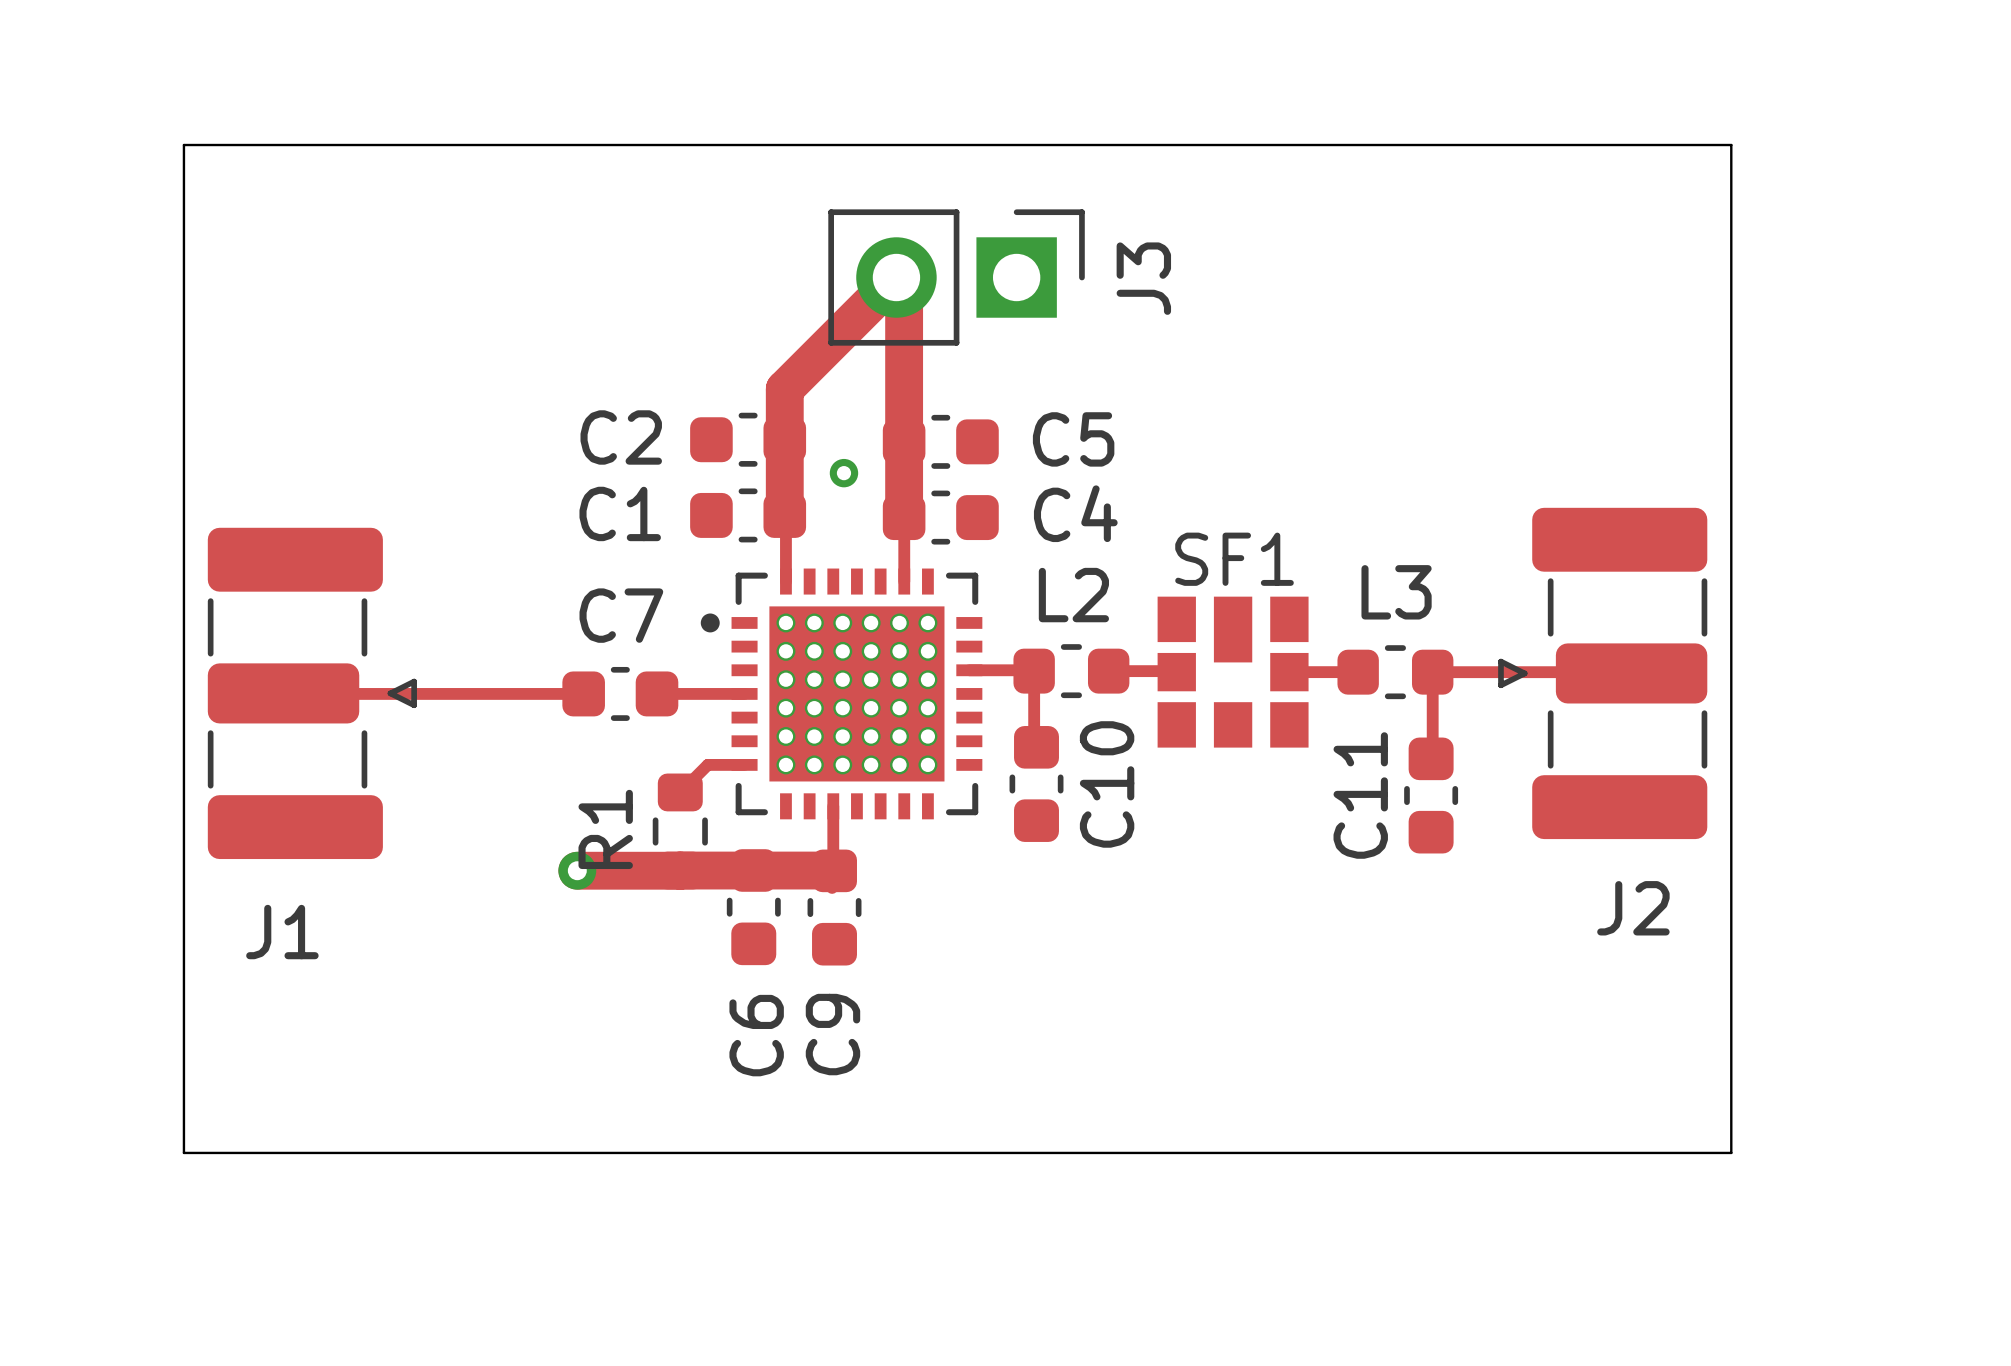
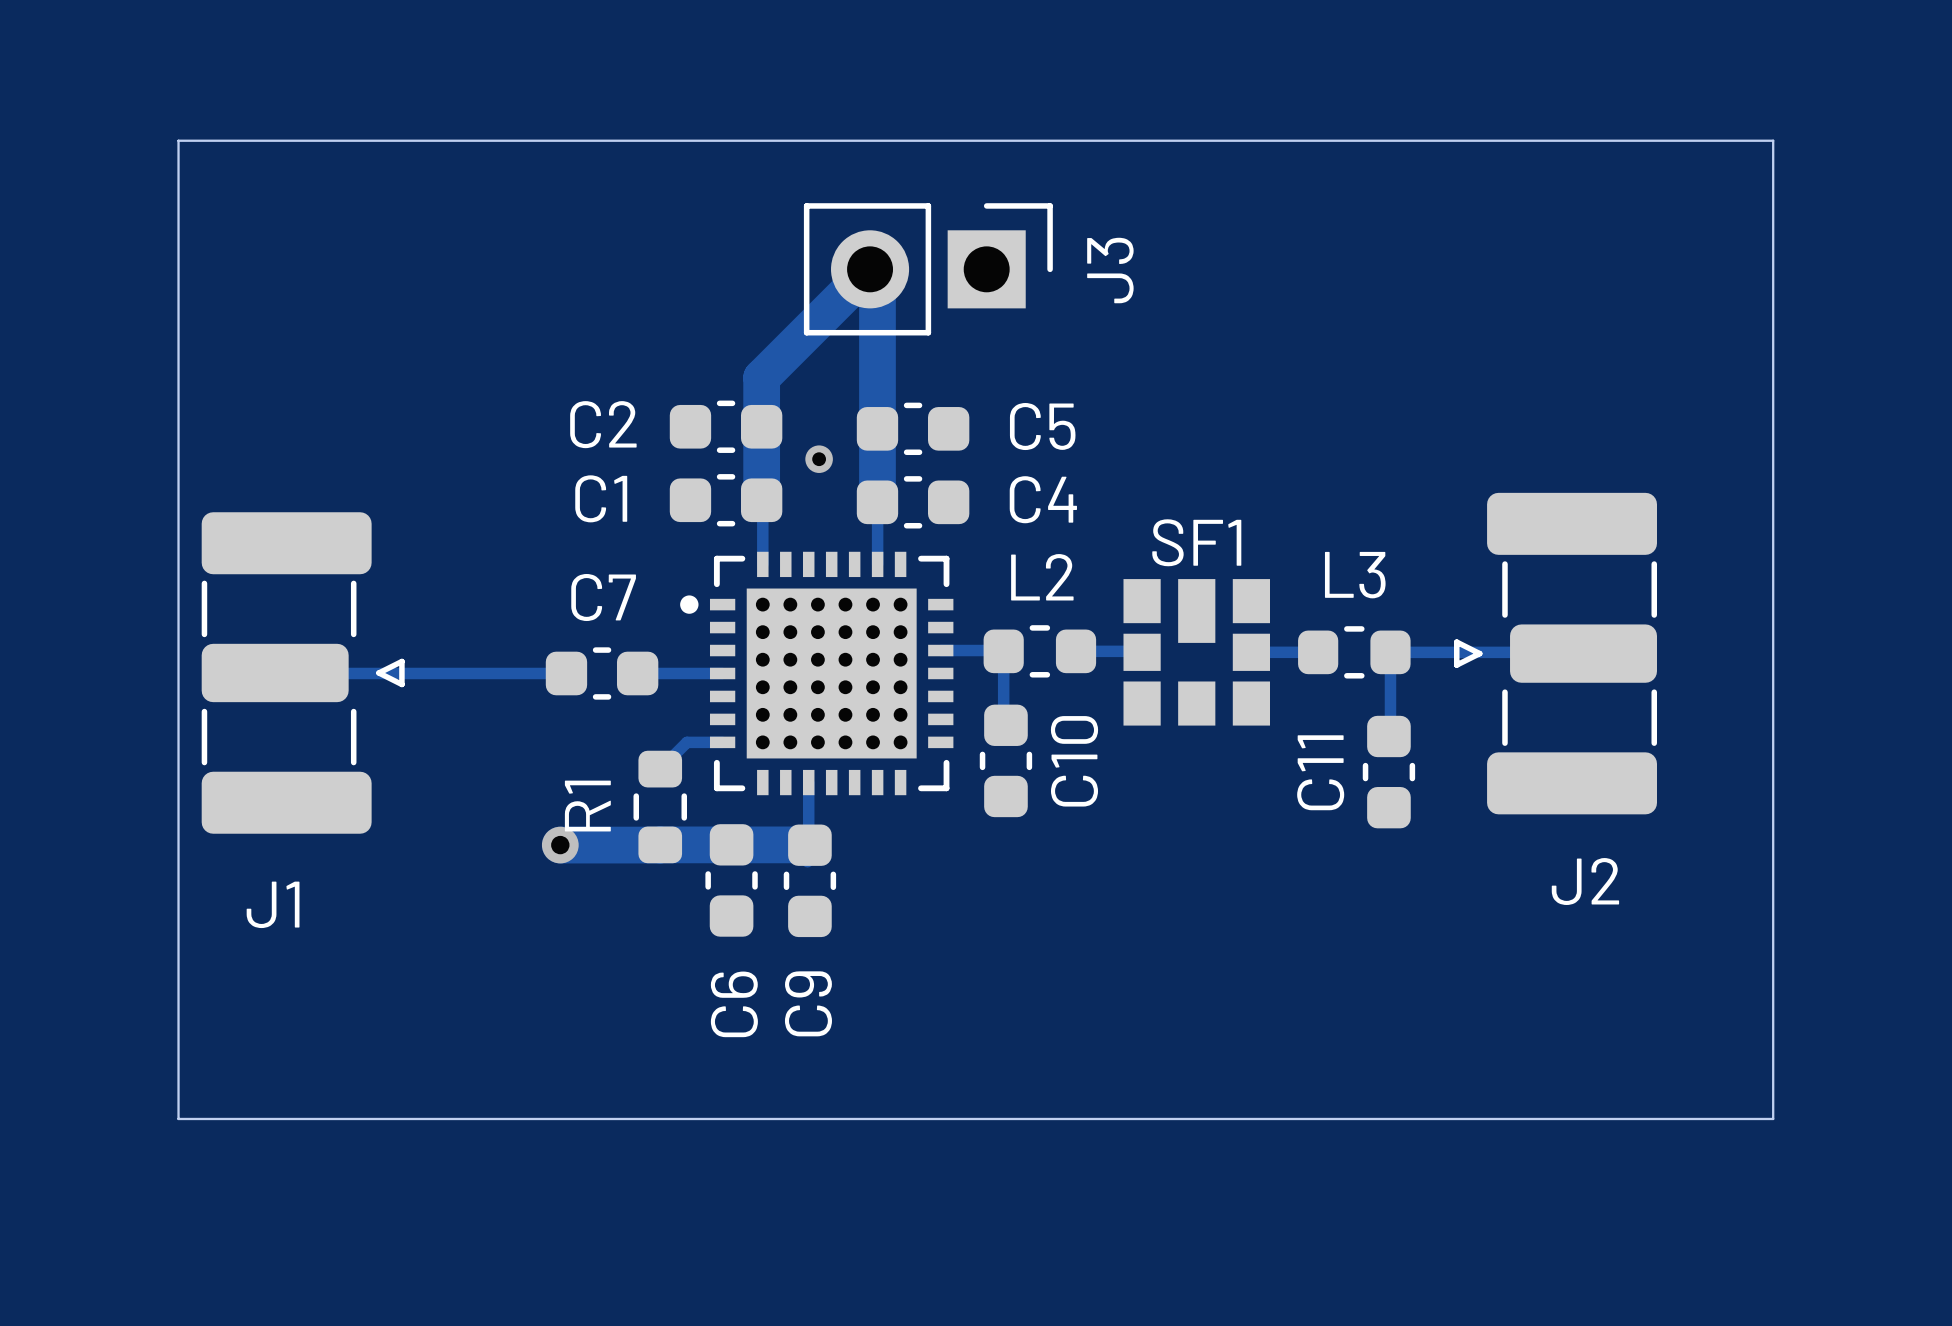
board edge: (1731, 145) (1731, 1152) -> (1680, 140) (1773, 140) (1773, 1118) (1680, 1118)

